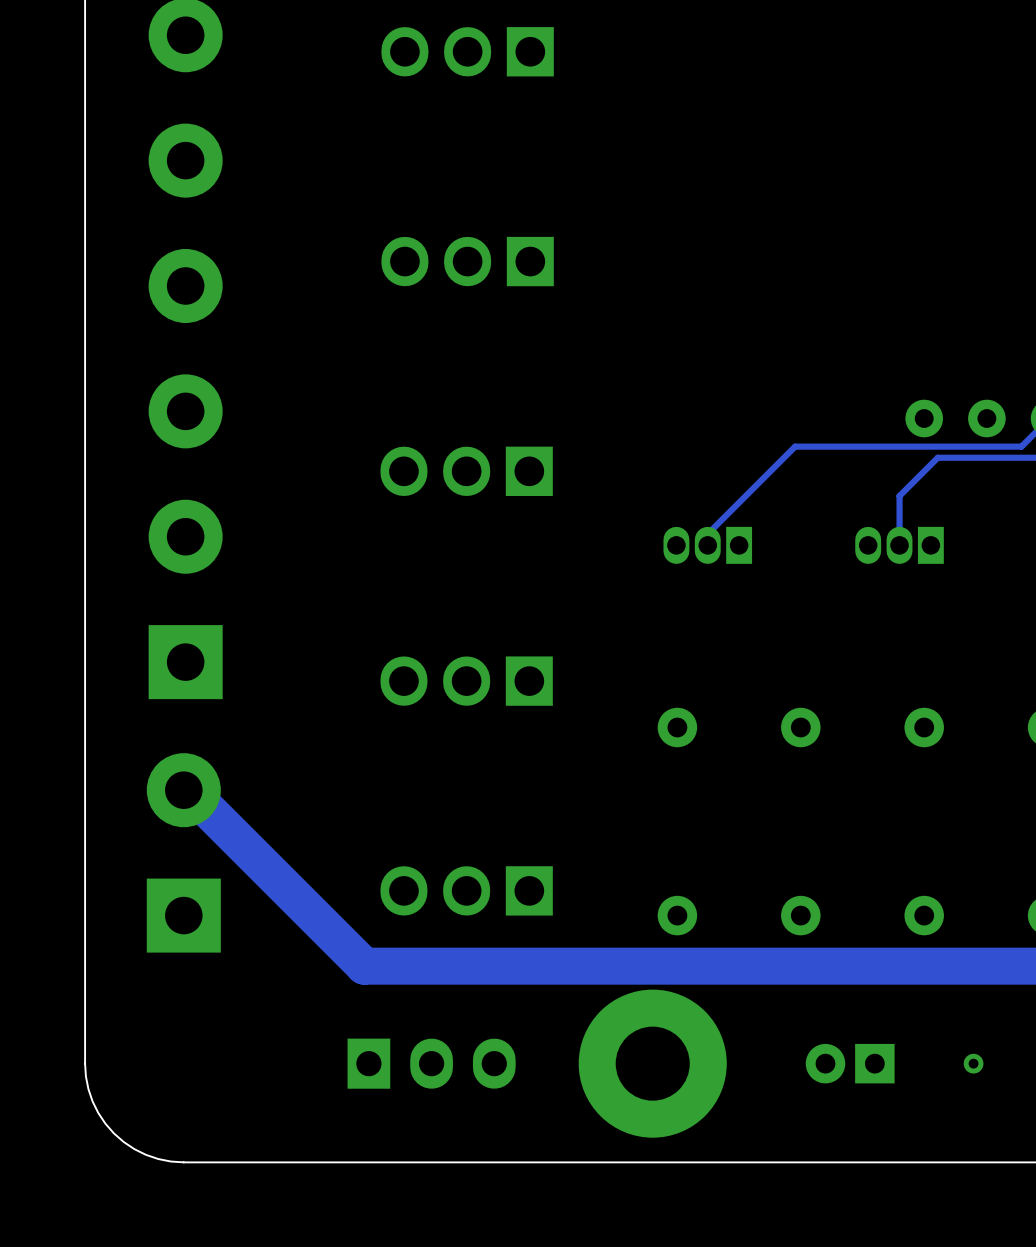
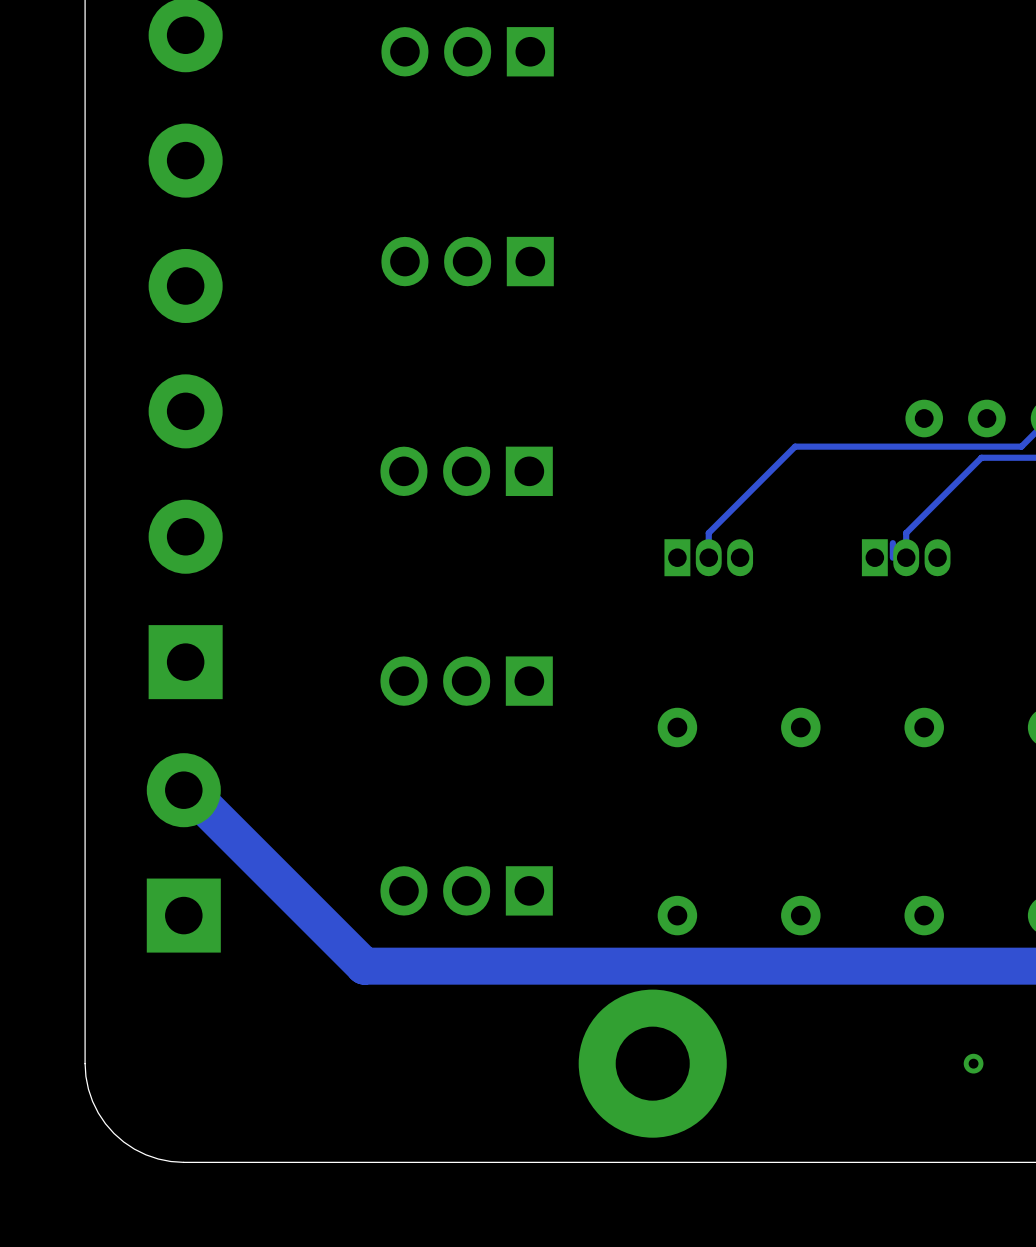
track: (981, 457) (937, 457) (899, 496) (899, 545) -> (981, 457) (906, 533) (906, 557)
track: none -> (892, 543) (892, 557)
part rotation: 0° (707, 545) -> 180° (708, 557)
part rotation: 0° (899, 545) -> 180° (906, 557)
part: (431, 1063) -> none
part: (850, 1063) -> none

